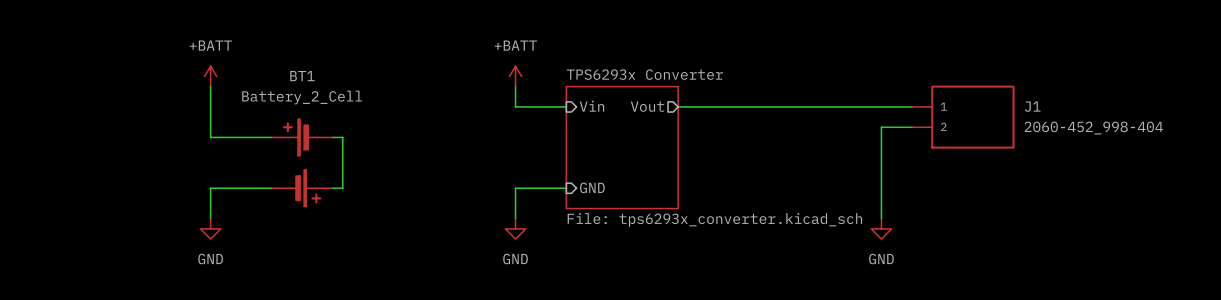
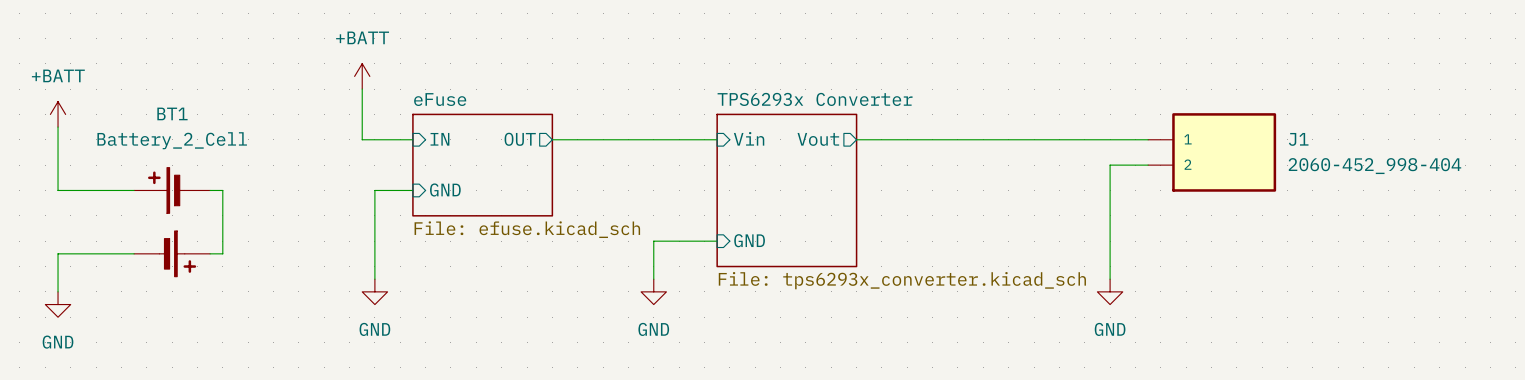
wire: none -> (362, 89) (362, 139) (412, 139)
power symbol position: +BATT (210, 76) -> +BATT (362, 76)
power symbol: +BATT (515, 76) -> none
power symbol: none -> +BATT (58, 114)
wire: (210, 86) (210, 137) (271, 137) -> (58, 127) (58, 190) (134, 190)
wire: (515, 86) (515, 106) -> (552, 139) (653, 139)
sheet pin: none -> IN (439, 139)
sheet pin: none -> OUT (520, 139)
sheet eFuse: none -> File: efuse.kicad_sch (482, 165)
wire: (332, 137) (342, 137) (342, 188) (332, 188) -> (210, 190) (222, 190) (222, 253) (210, 253)
wire: none -> (412, 190) (374, 190) (374, 279)
sheet pin: none -> GND (445, 190)
BT1 position: (302, 162) -> (172, 222)
wire: (271, 188) (210, 188) (210, 218) -> (134, 253) (58, 253) (58, 291)
power symbol position: GND (210, 228) -> GND (374, 291)
power symbol: none -> GND (58, 304)

